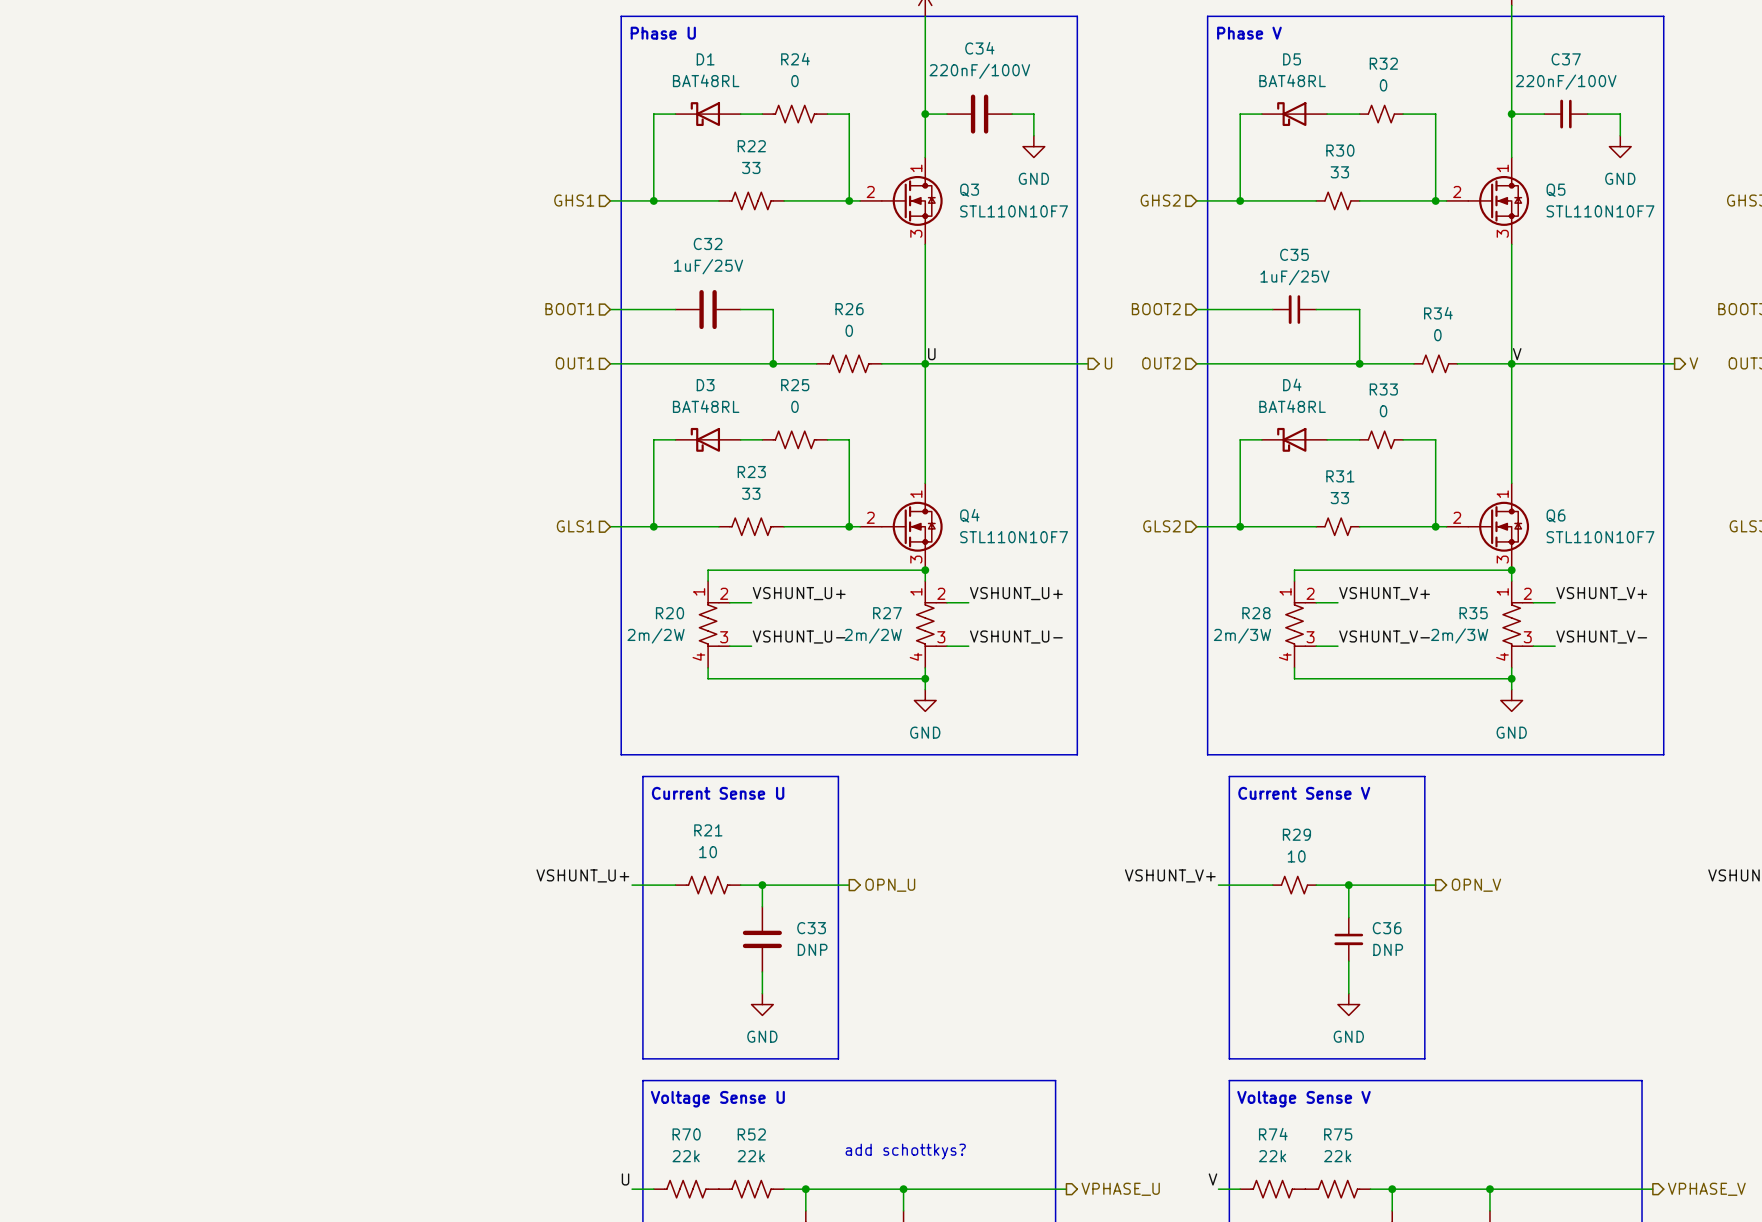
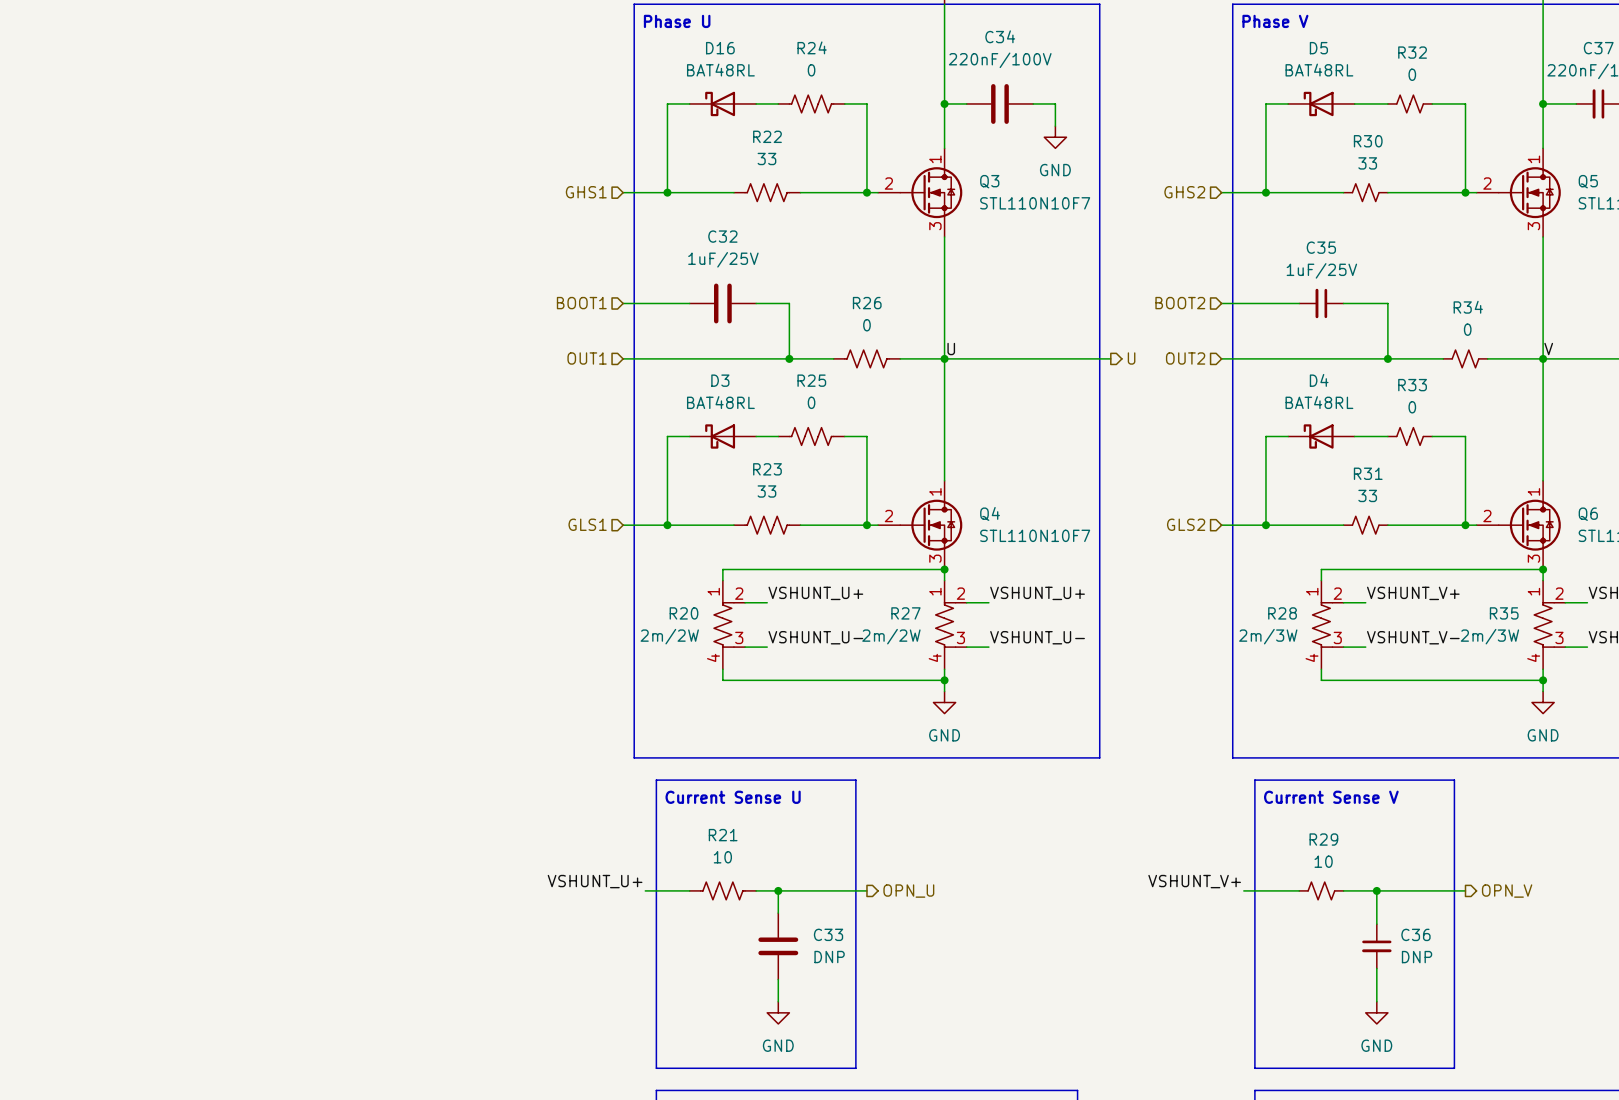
D1 name: D1 (705, 59) -> D16 (720, 48)

